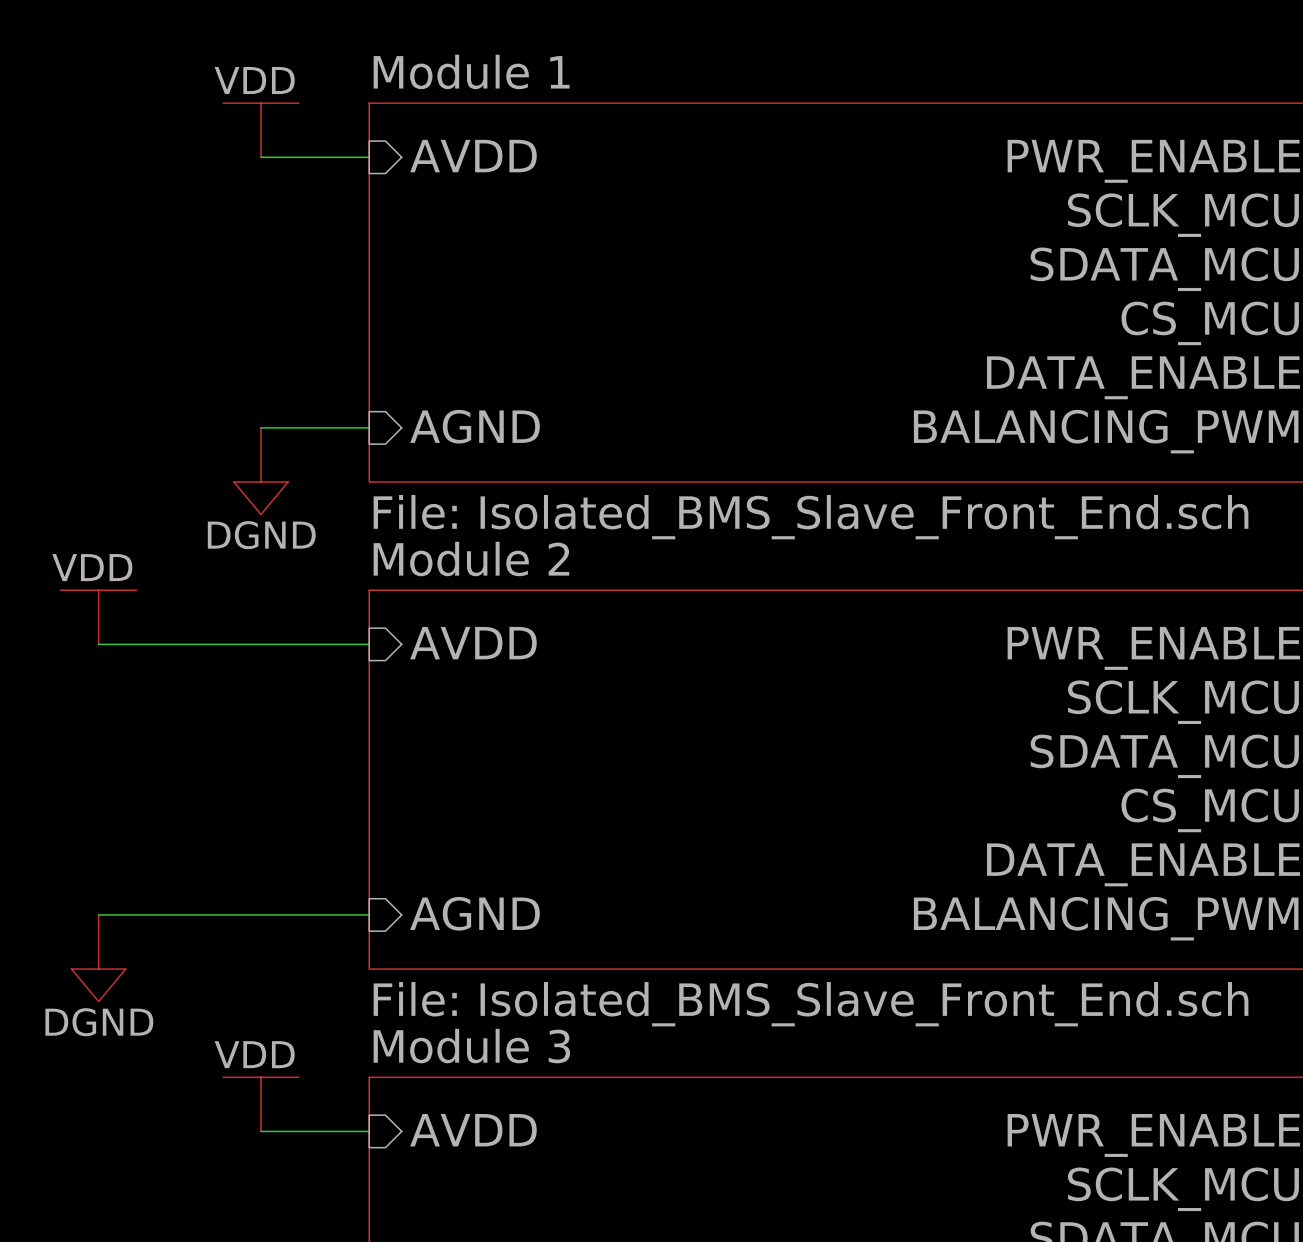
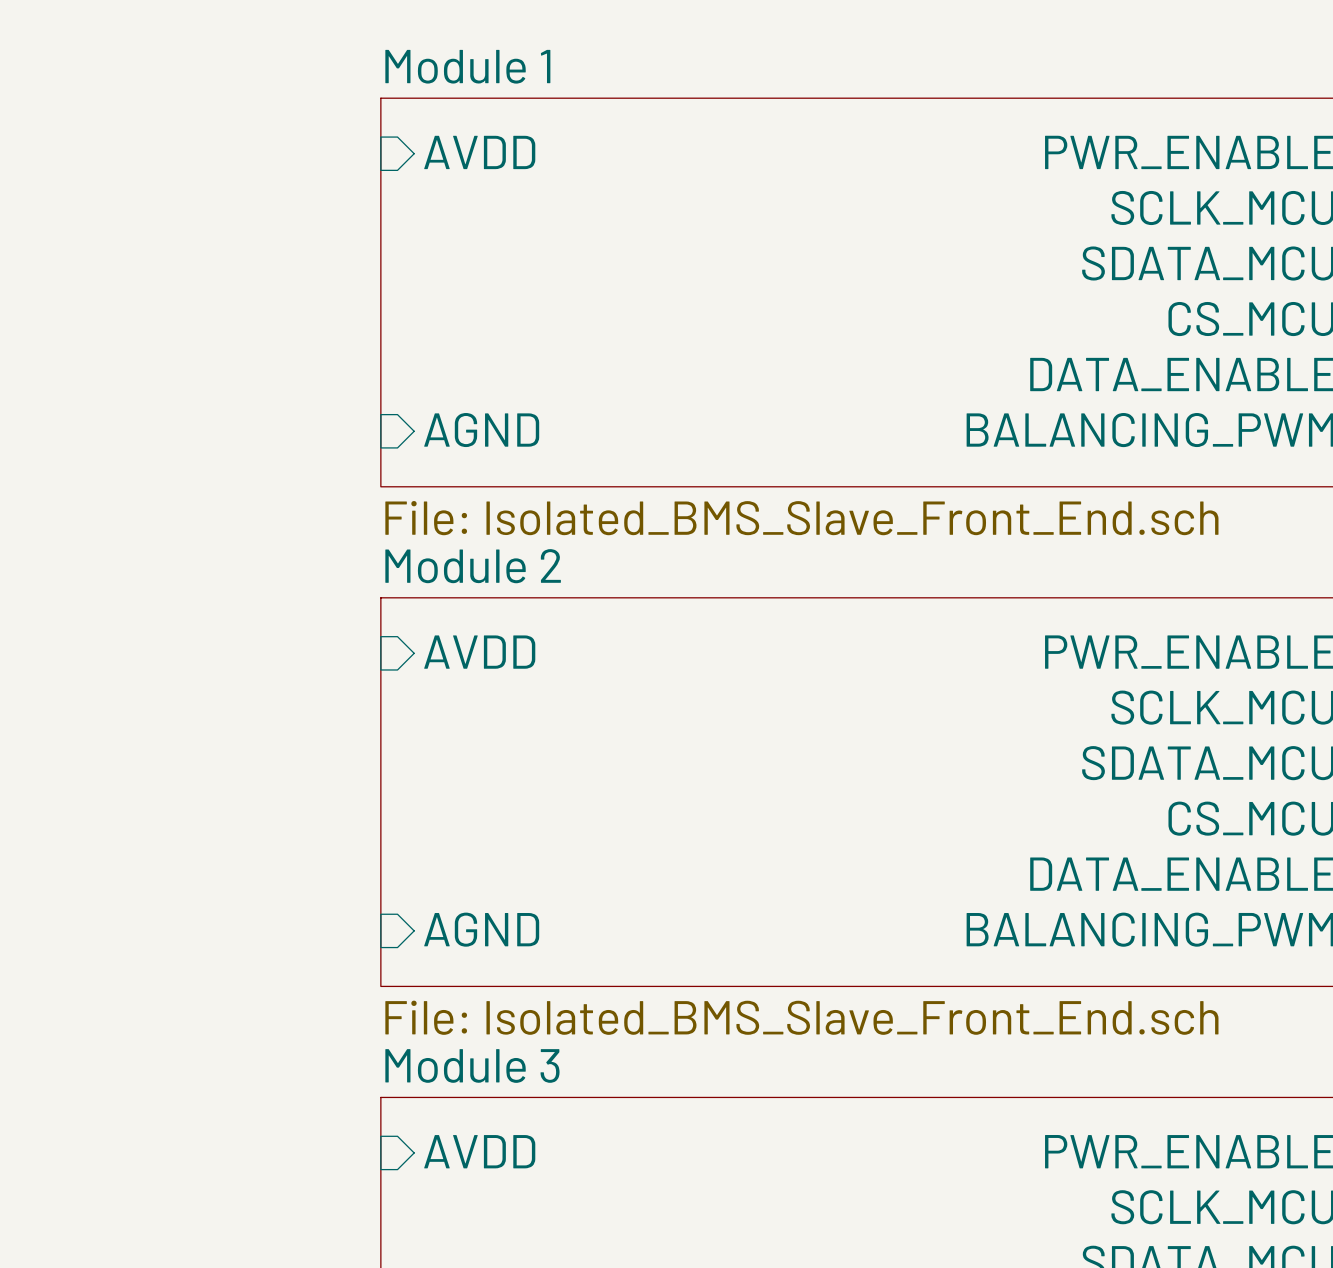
power symbol: VDD (261, 130) -> none
wire: (261, 157) (369, 157) -> none
wire: (261, 427) (369, 427) -> none
power symbol: DGND (261, 471) -> none
power symbol: VDD (98, 617) -> none
wire: (98, 644) (369, 644) -> none
wire: (98, 914) (369, 914) -> none
power symbol: DGND (98, 958) -> none
power symbol: VDD (261, 1104) -> none
wire: (261, 1131) (369, 1131) -> none

